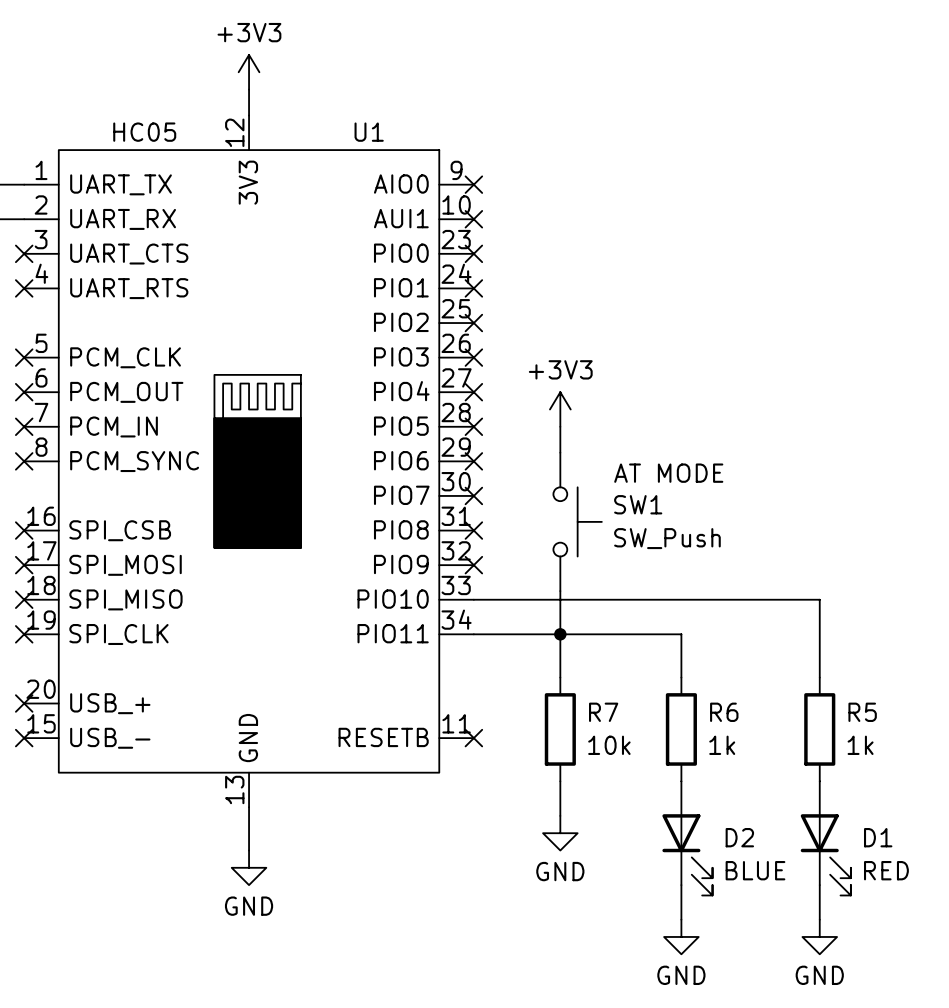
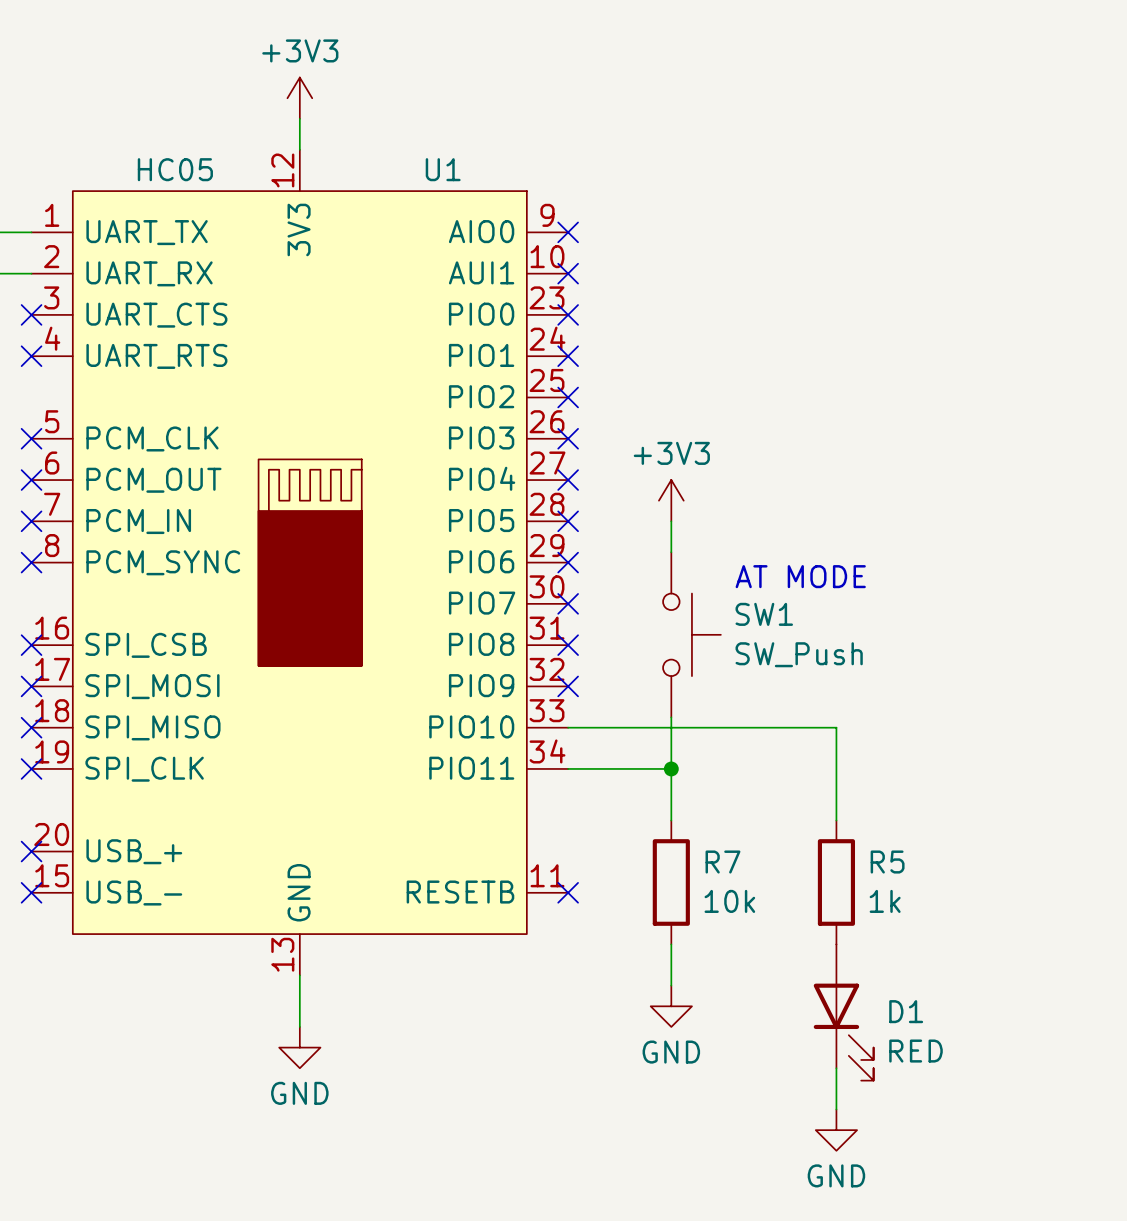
wire: (698, 599) (819, 599) (819, 677) -> (836, 727) (836, 820)
wire: (560, 634) (681, 634) (681, 677) -> none
R6: 1k (681, 729) -> none
R5 position: (819, 729) -> (836, 882)
D2: BLUE (687, 838) -> none
D1 position: (825, 838) -> (843, 1012)
wire: (681, 885) (681, 919) -> (836, 1068) (836, 1109)
wire: (819, 885) (819, 919) -> none
power symbol position: GND (681, 936) -> GND (836, 1130)
power symbol: GND (819, 936) -> none

